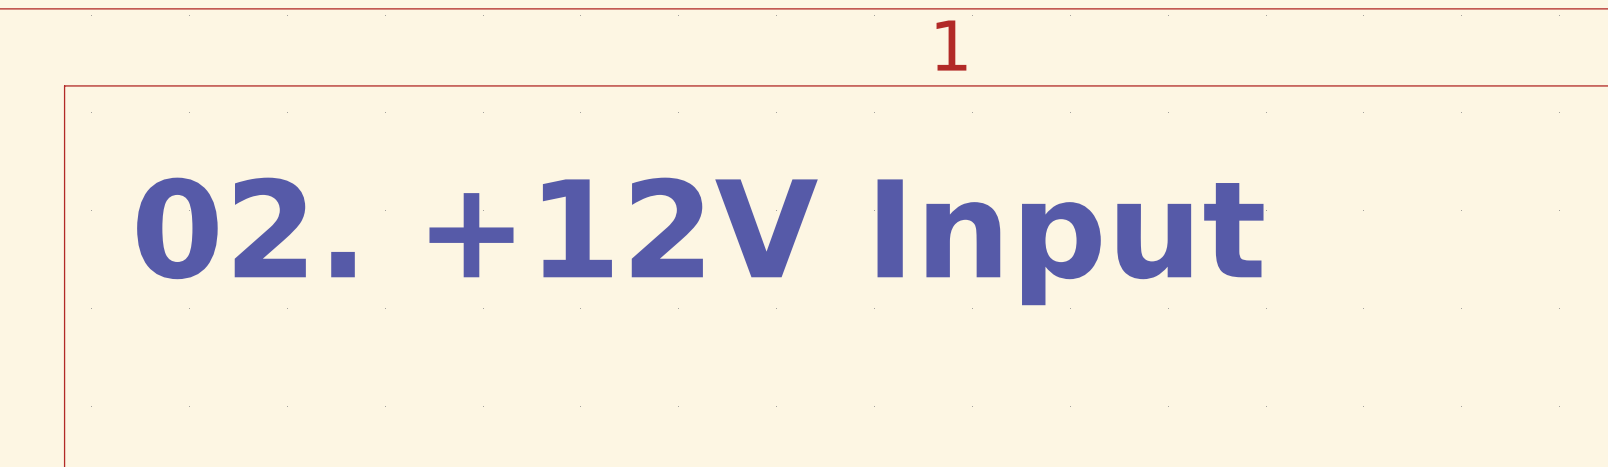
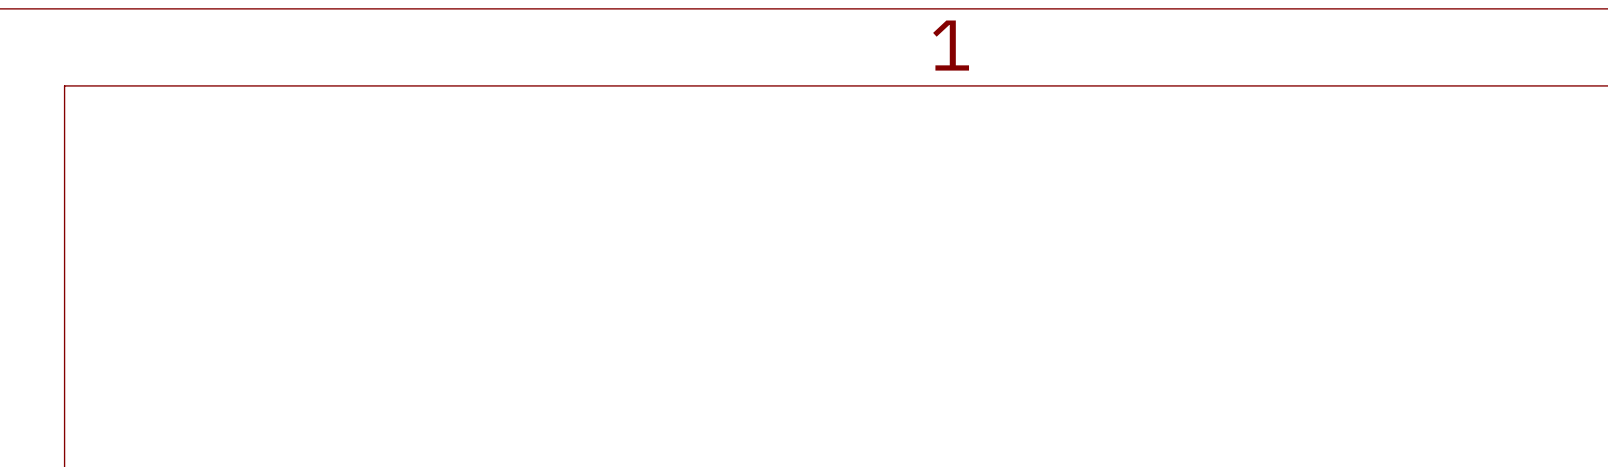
text: 02. +12V Input (700, 241) -> none

